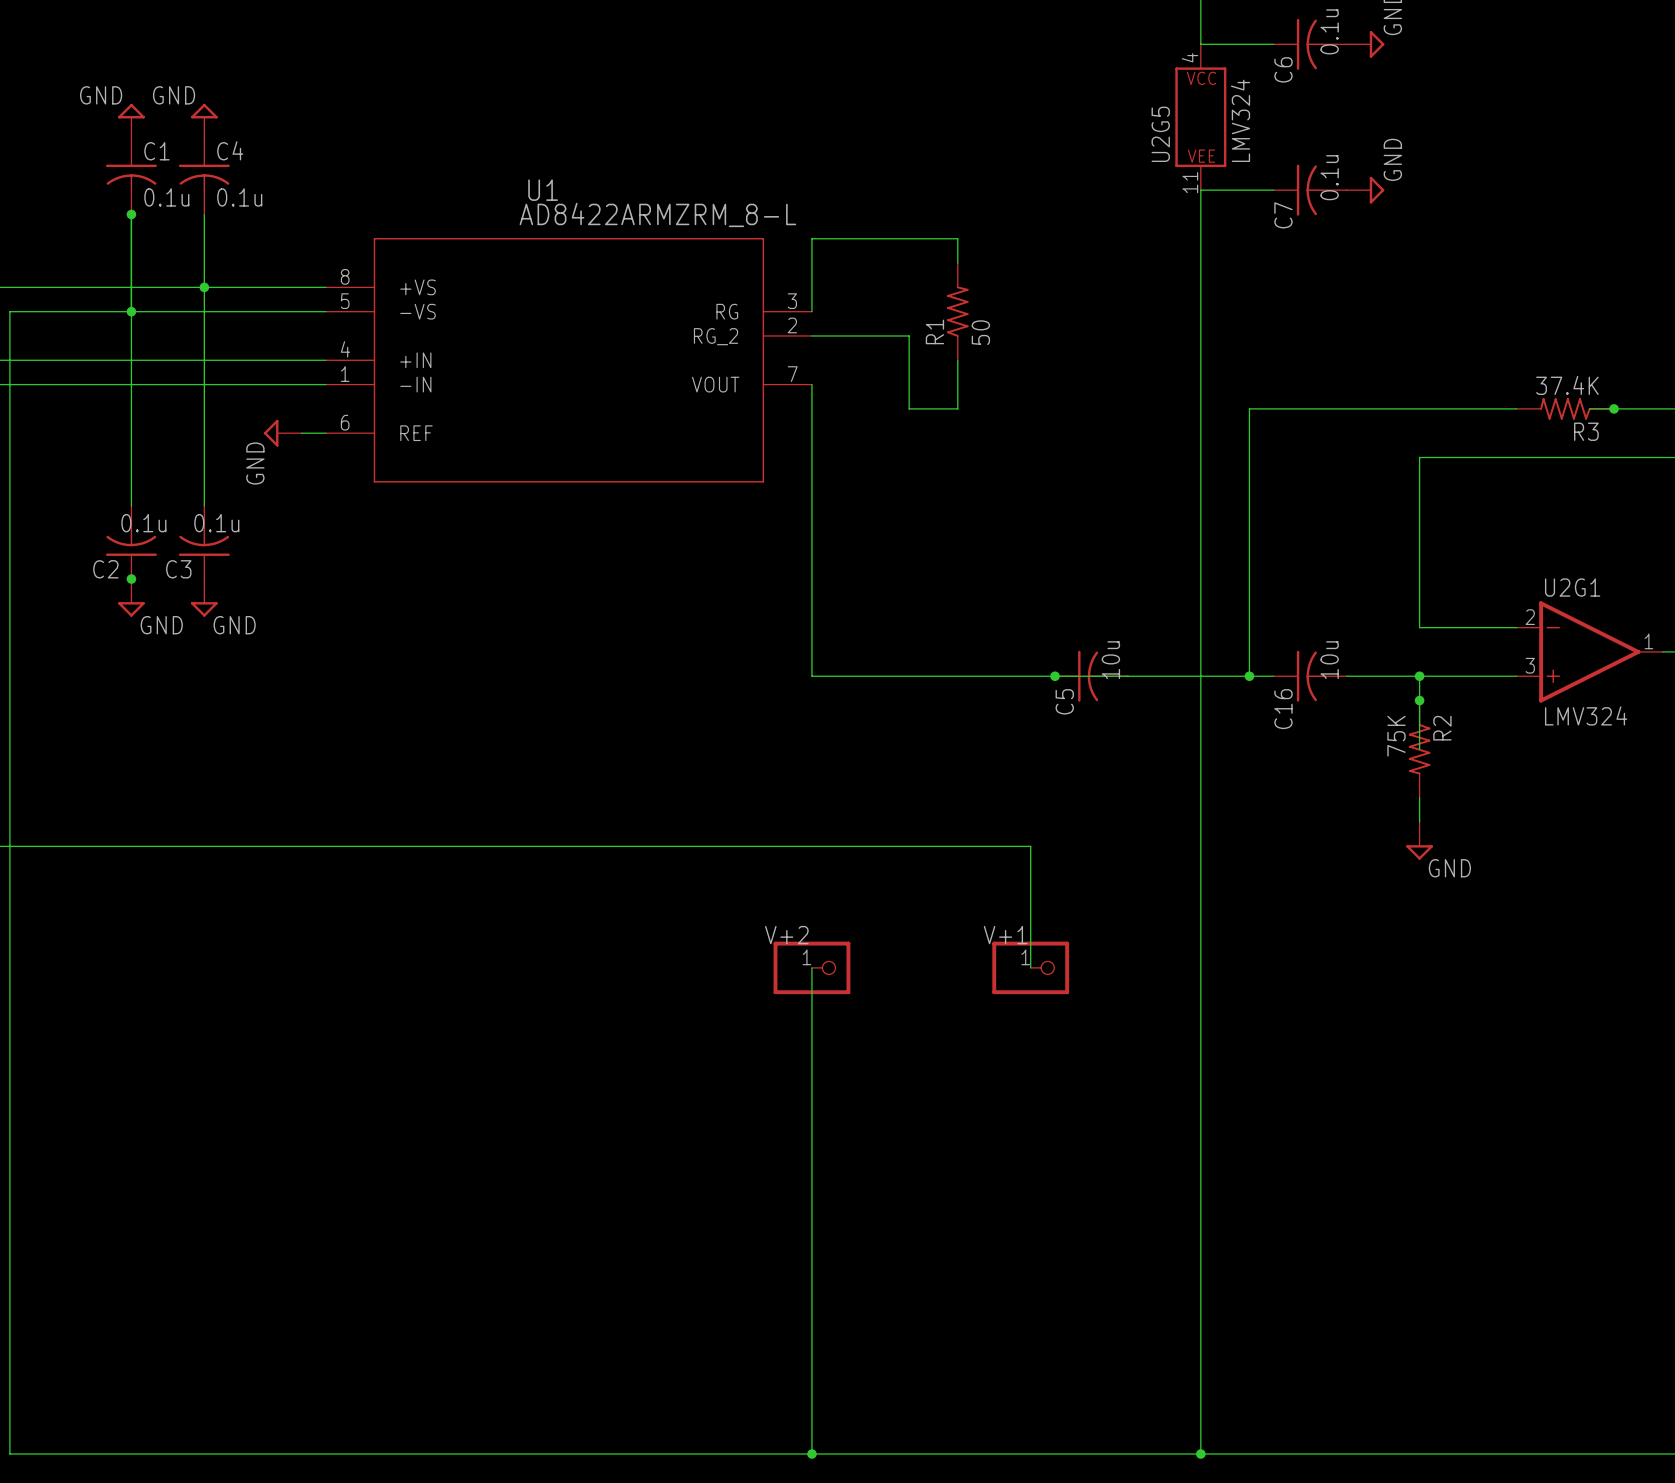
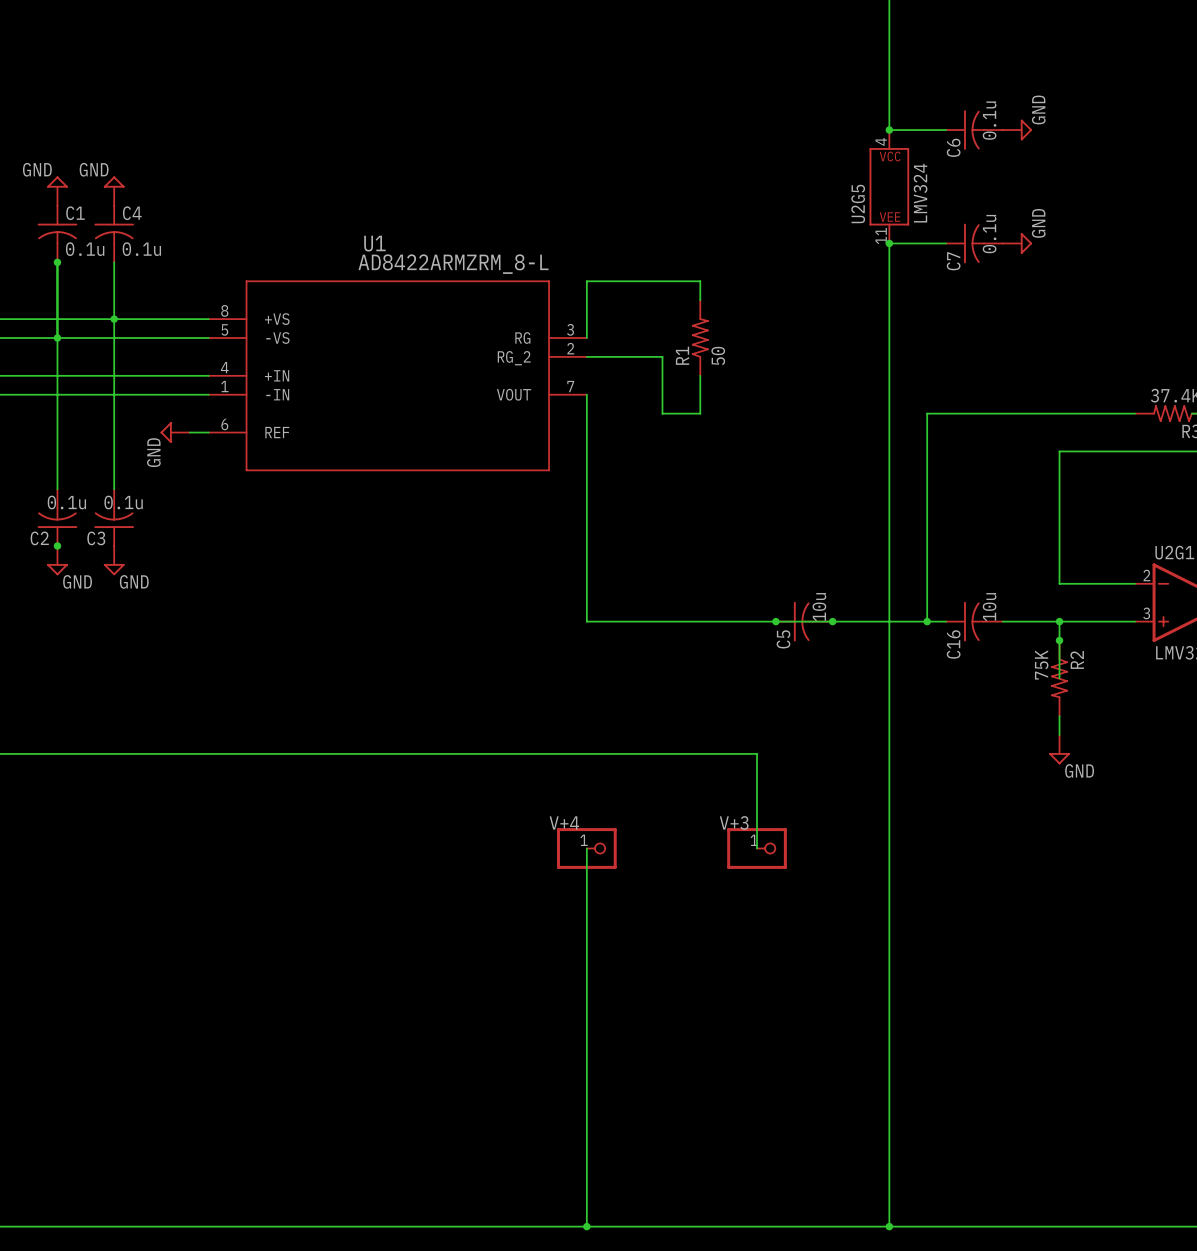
junction: none -> (889, 130)
junction: none -> (889, 243)
junction: none -> (832, 621)
label: V+2 (786, 935) -> V+4 (564, 822)
label: V+1 (1005, 935) -> V+3 (734, 822)

